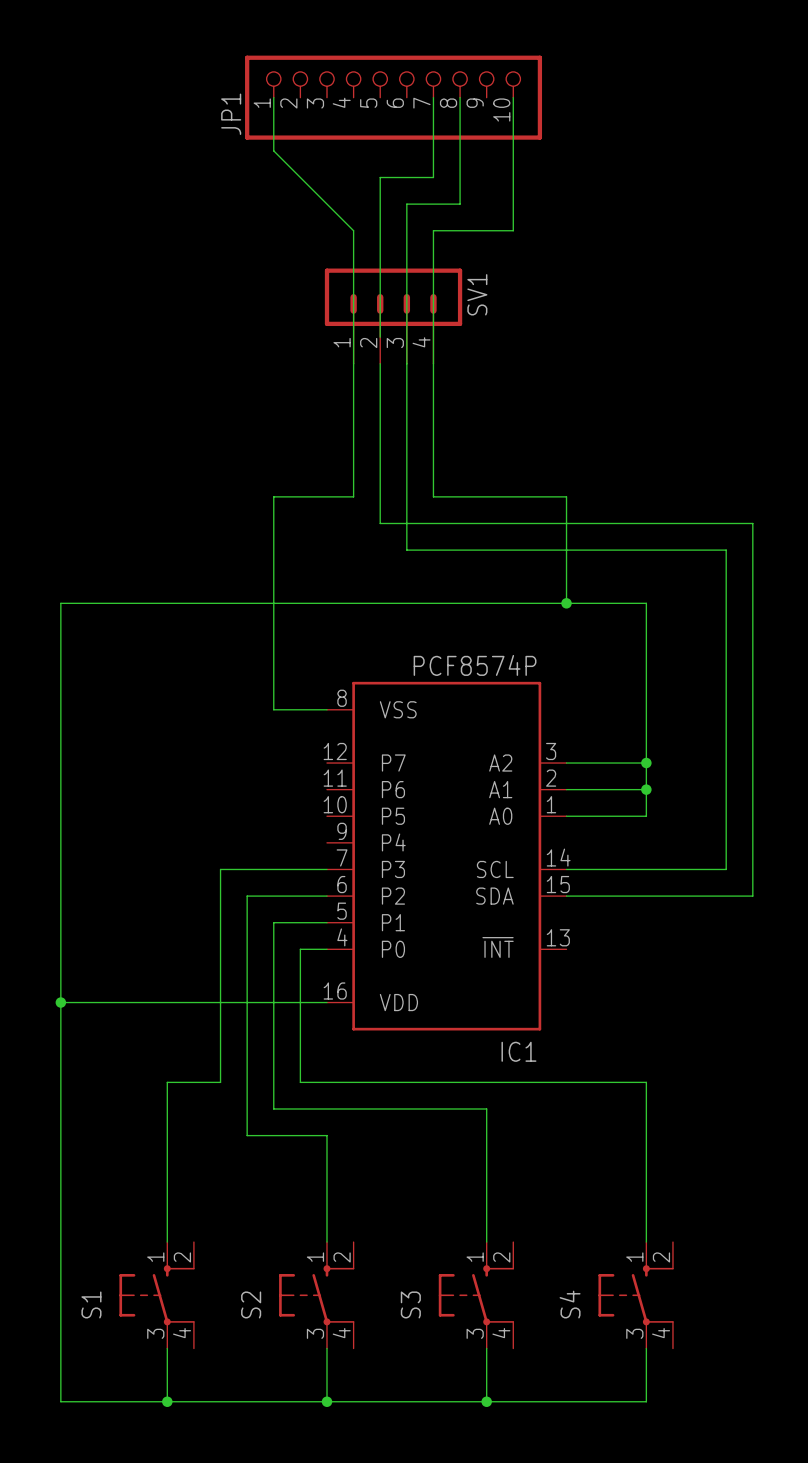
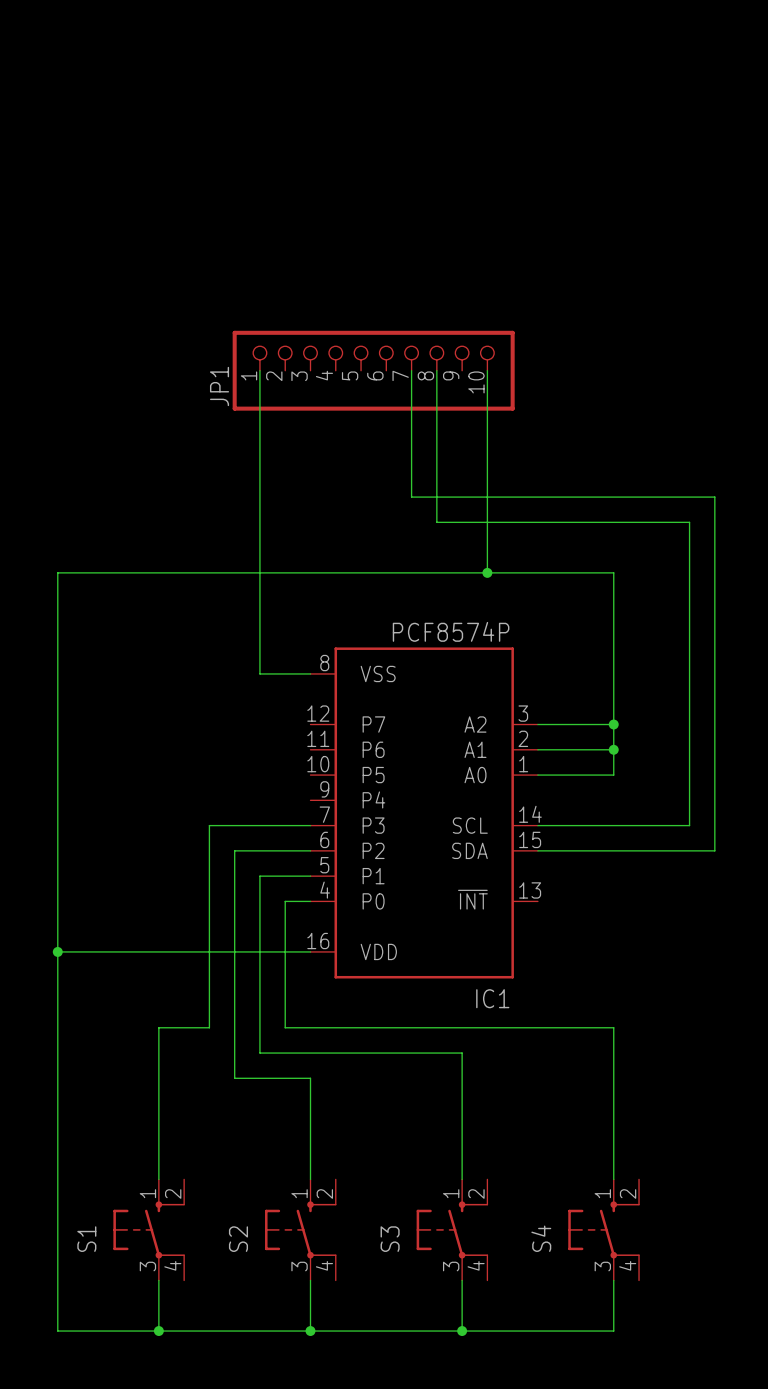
wire: (273, 97) (273, 150) (353, 230) (353, 496) (273, 496) -> (259, 370) (259, 471)
JP1 position: (393, 97) -> (373, 370)
wire: (433, 97) (433, 177) (380, 177) (380, 337) -> none
wire: (460, 97) (460, 204) (406, 204) (406, 550) (460, 550) -> (436, 370) (436, 522)
wire: (513, 97) (513, 230) (433, 230) (433, 390) -> none
SV1: (393, 316) -> none
wire: (380, 363) (380, 523) (433, 523) -> (411, 471) (411, 497)
wire: none -> (487, 370) (487, 572)
wire: (433, 496) (566, 496) (566, 603) -> none
junction position: (566, 603) -> (487, 572)

